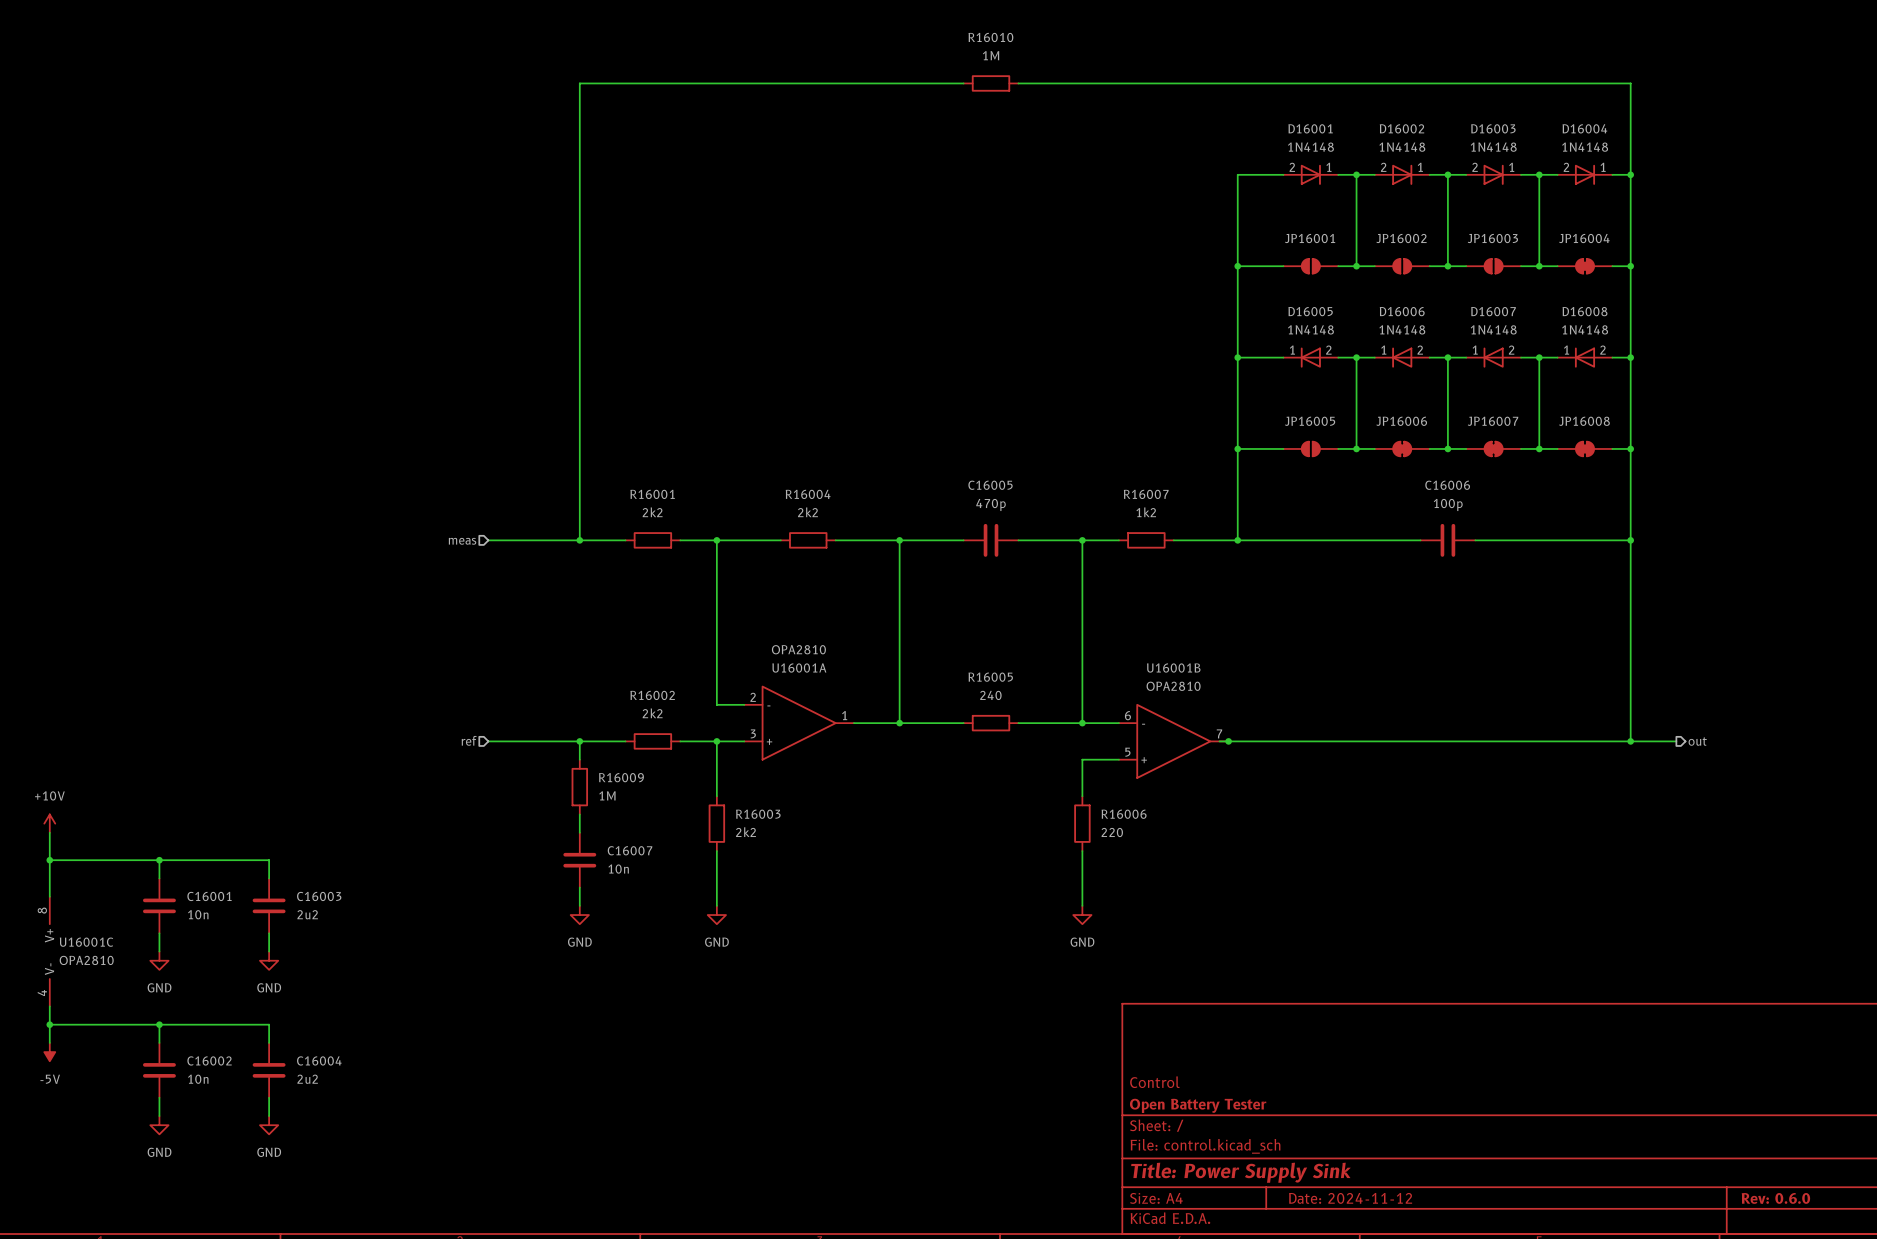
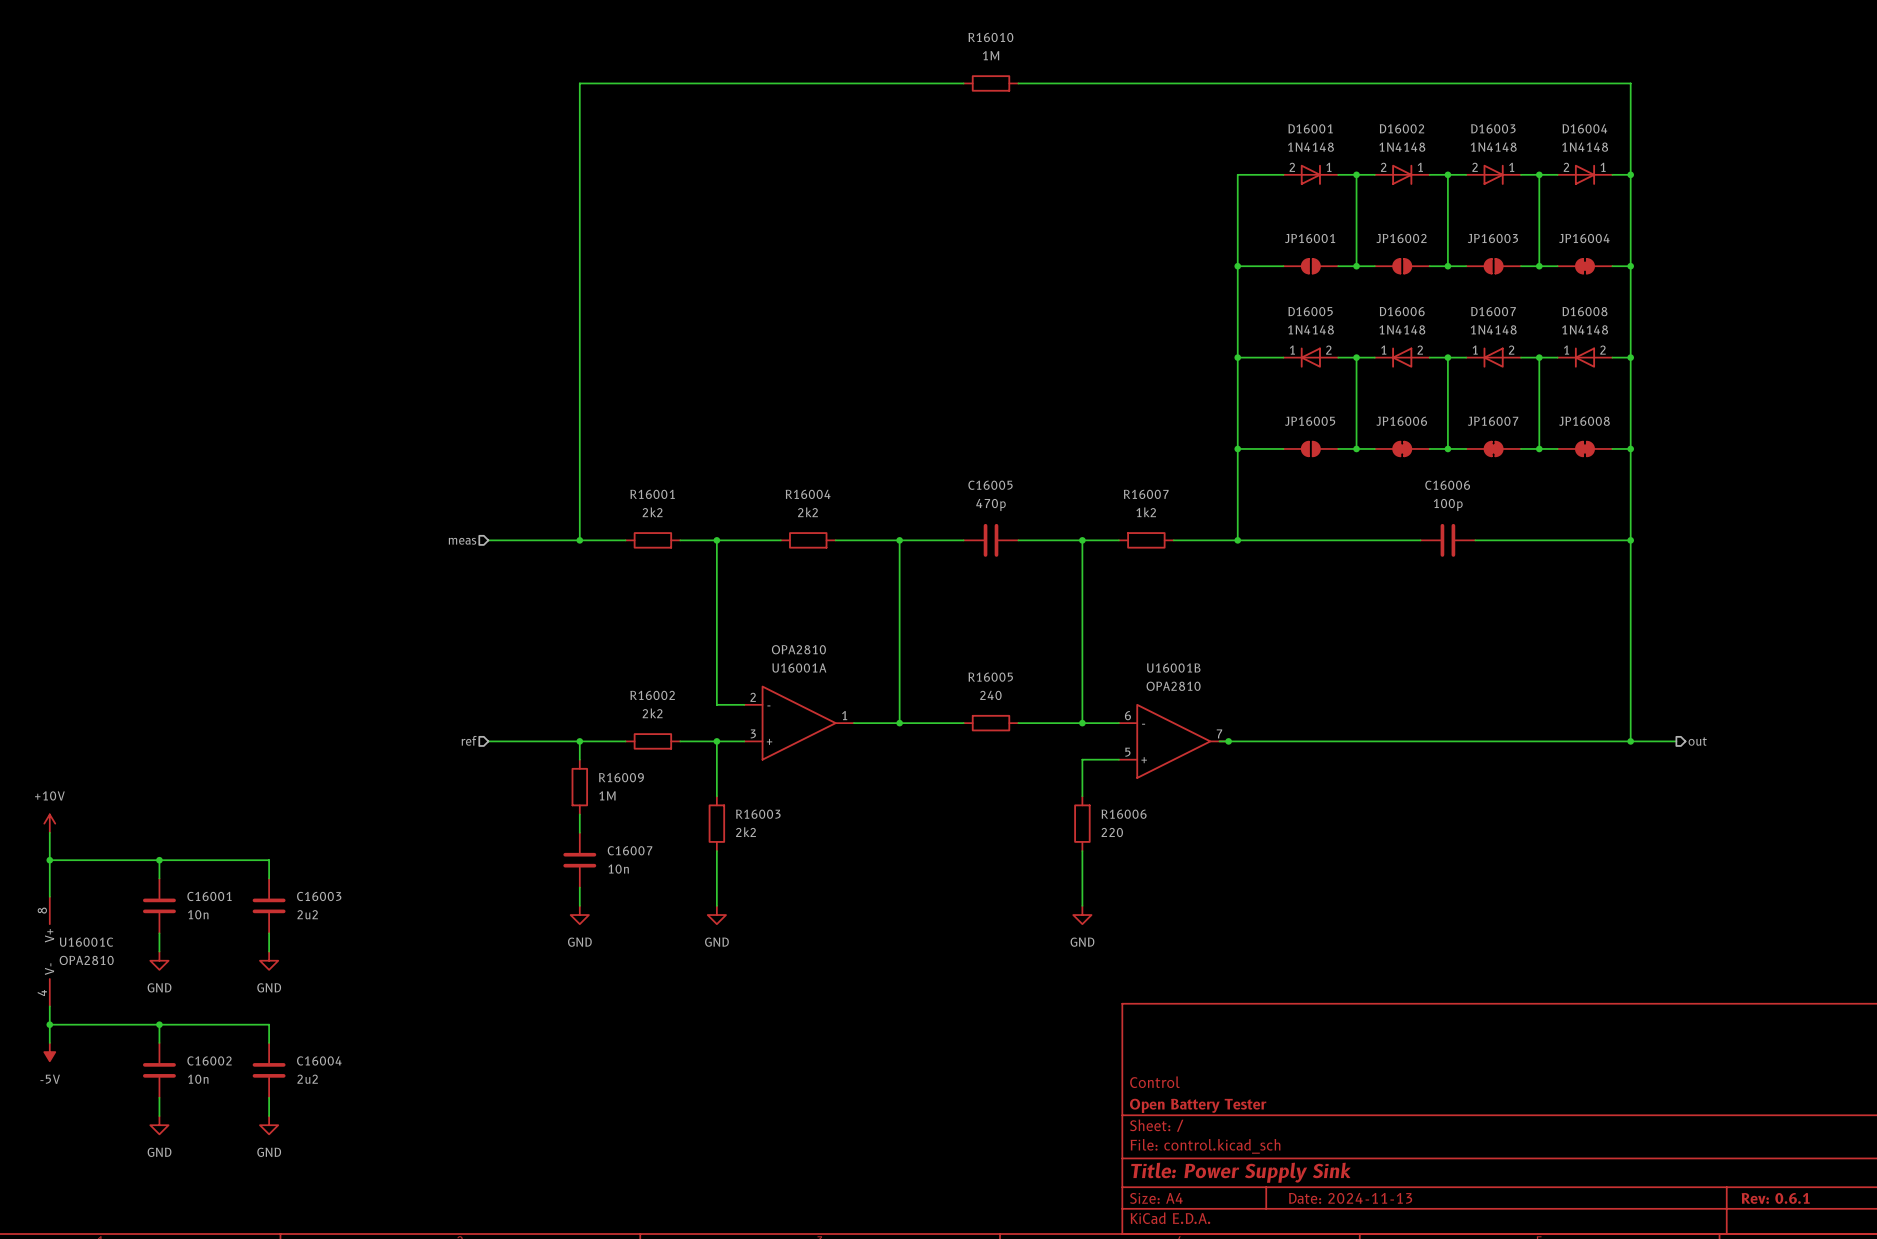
title block: Date: 2024-11-12 (1350, 1198) -> Date: 2024-11-13 (1350, 1198)
title block: Rev: 0.6.0 (1775, 1198) -> Rev: 0.6.1 (1775, 1198)

